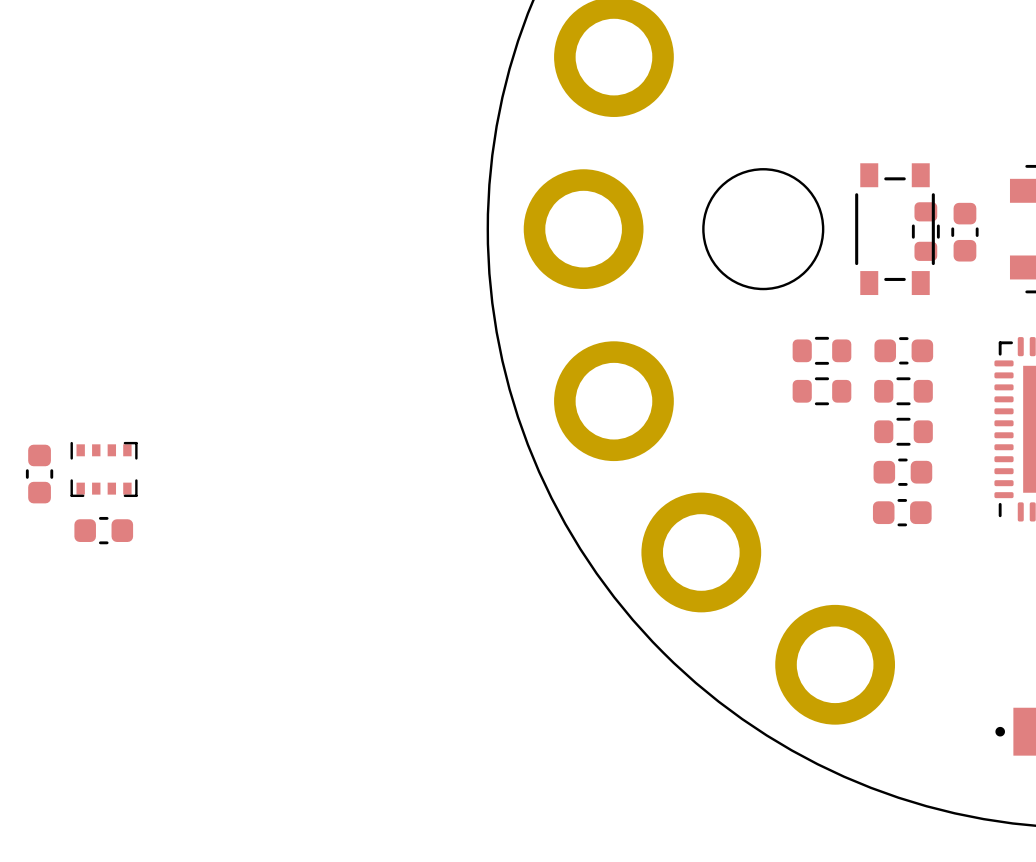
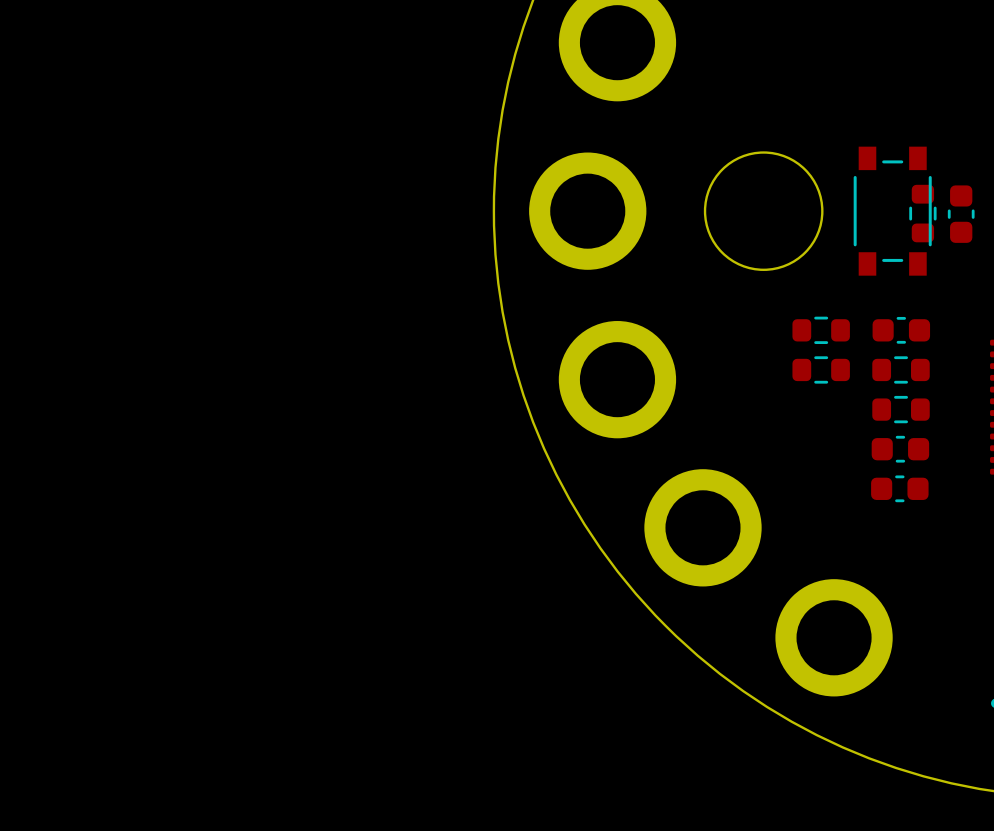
part: (104, 469) -> none
part: (39, 474) -> none
part: (103, 530) -> none

